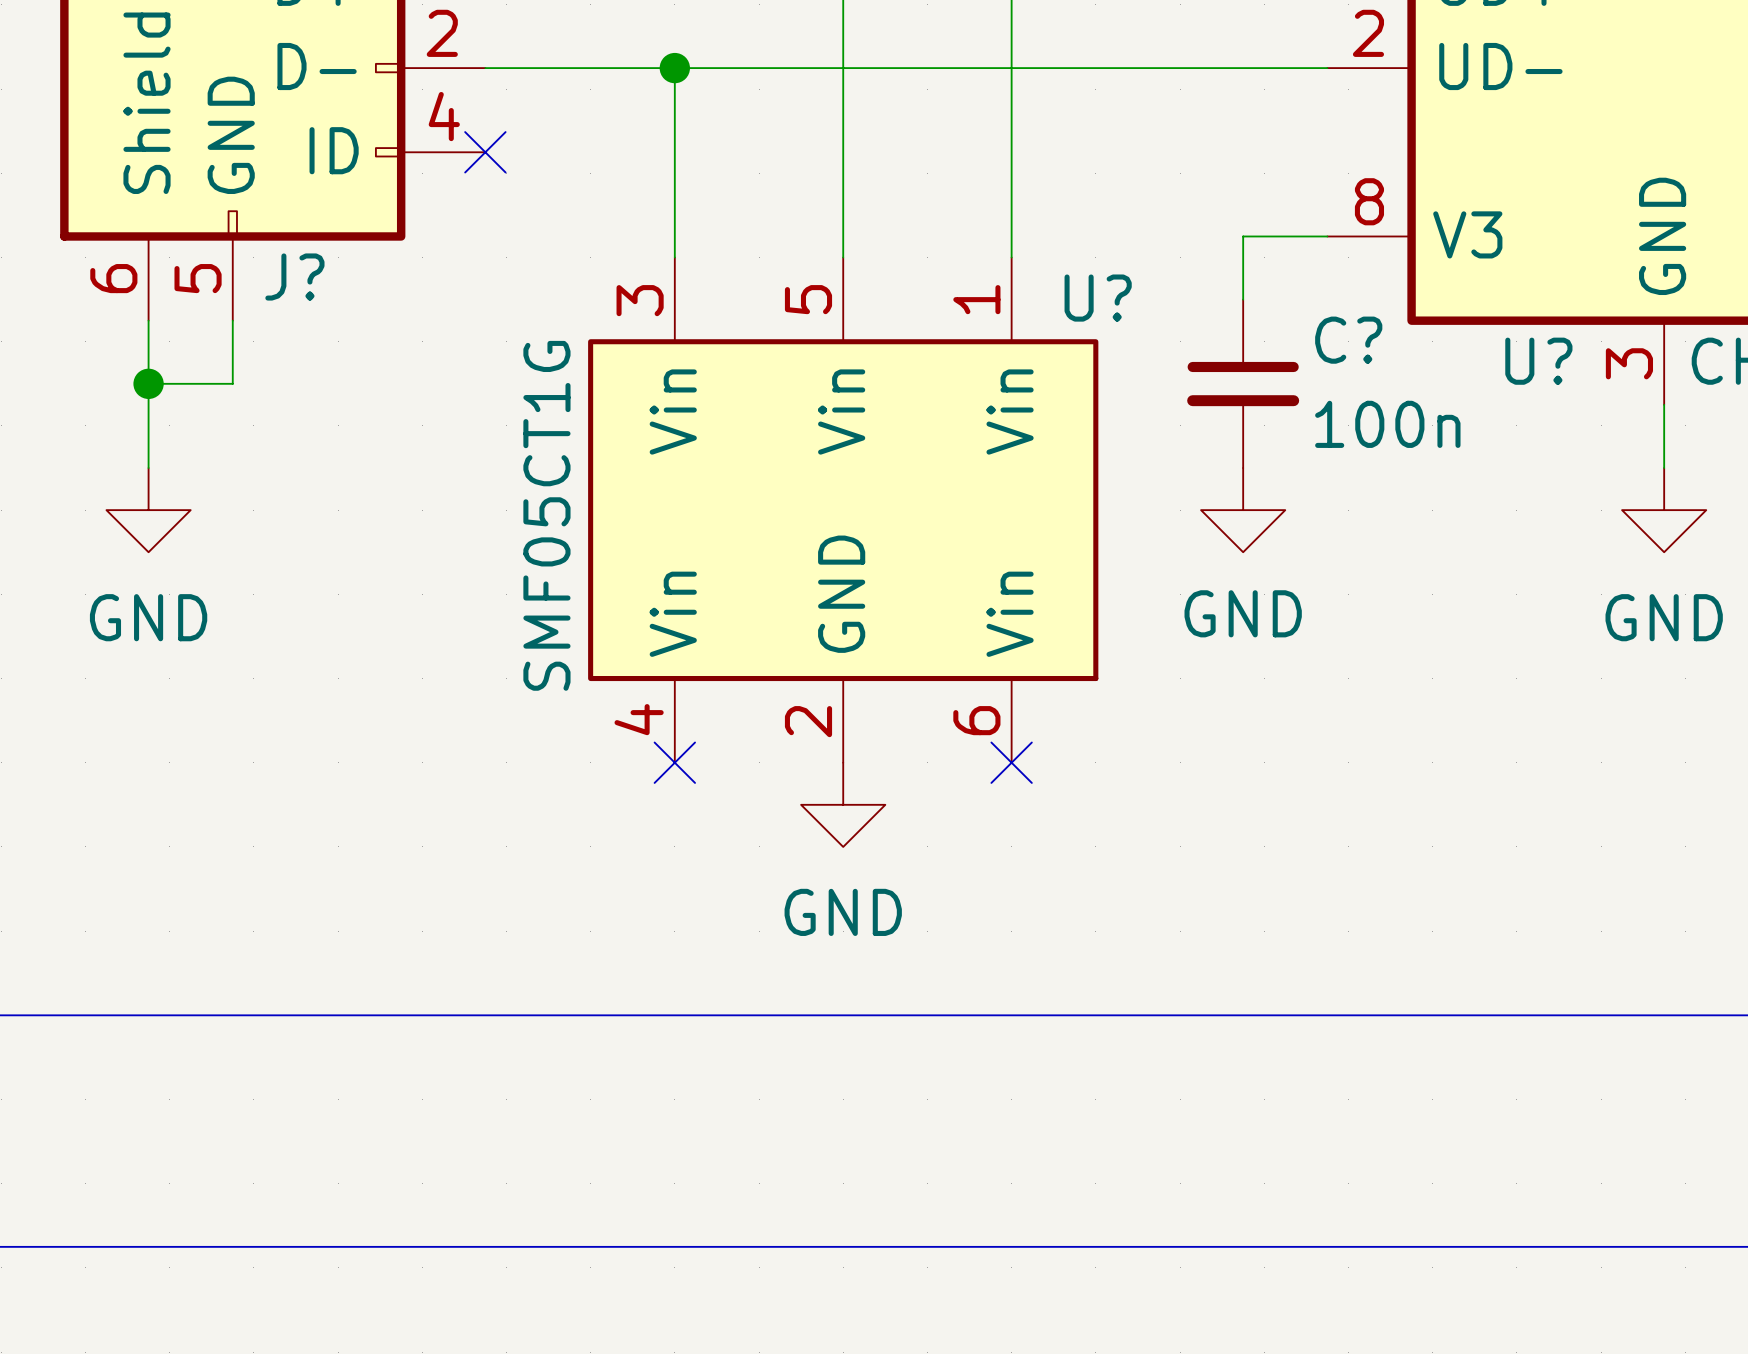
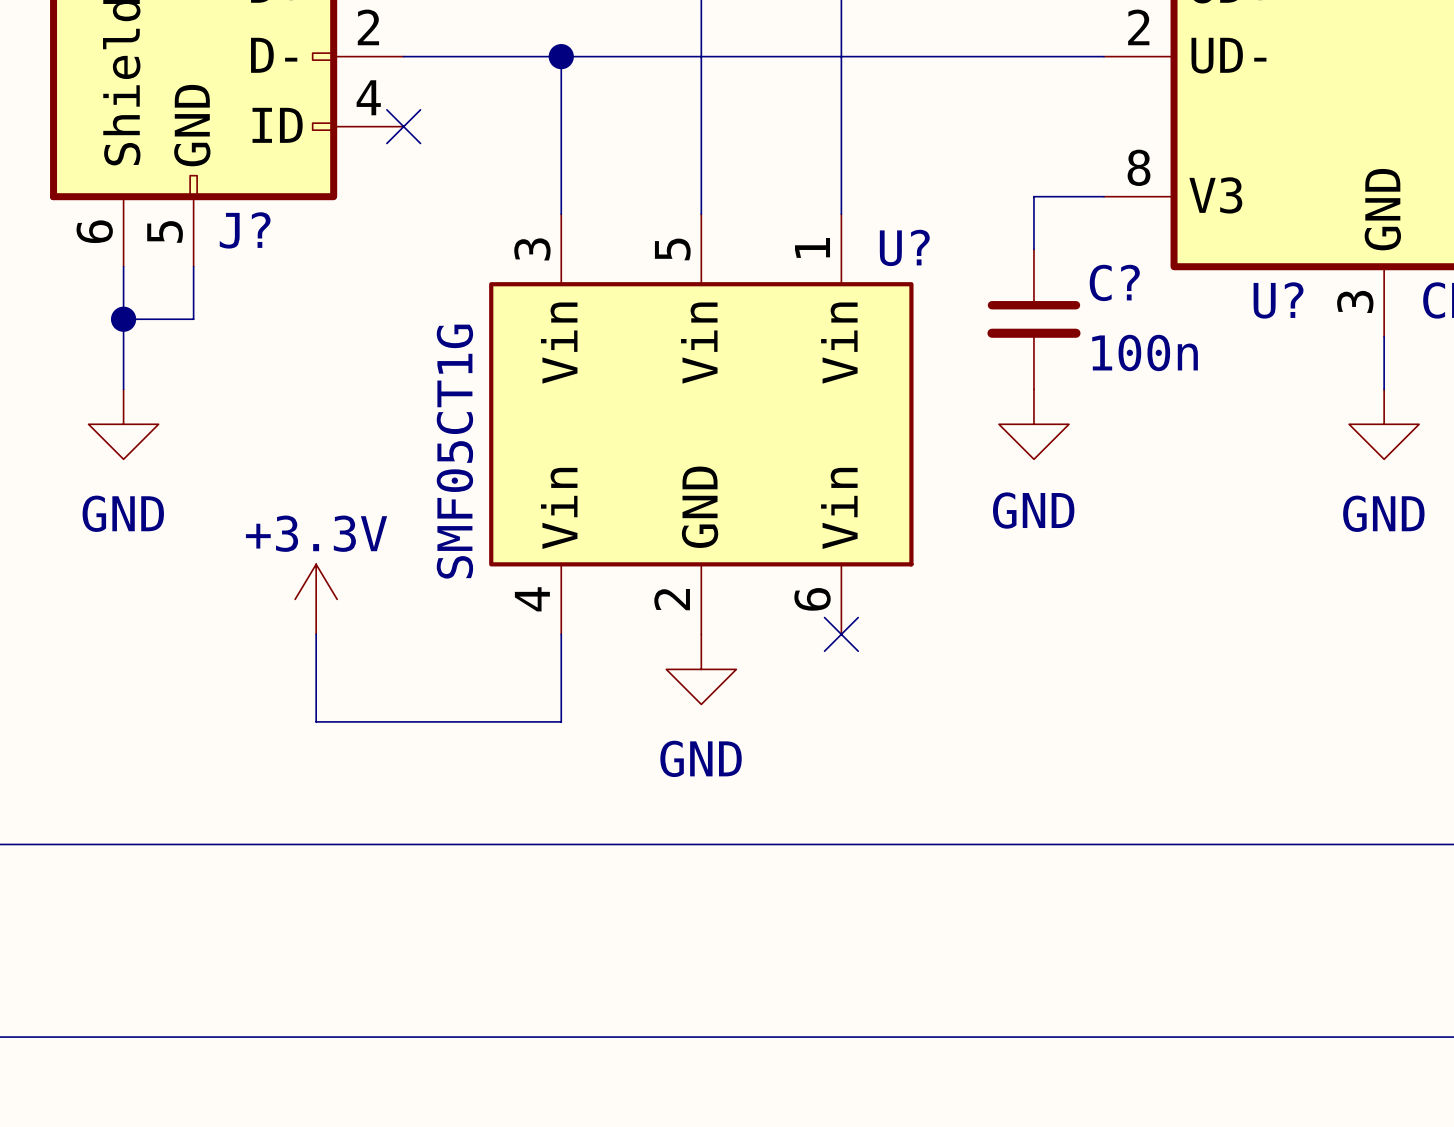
power symbol: none -> +3.3V (316, 599)
wire: none -> (316, 634) (316, 721) (561, 721) (561, 634)
no-connect mark: (674, 762) -> none

